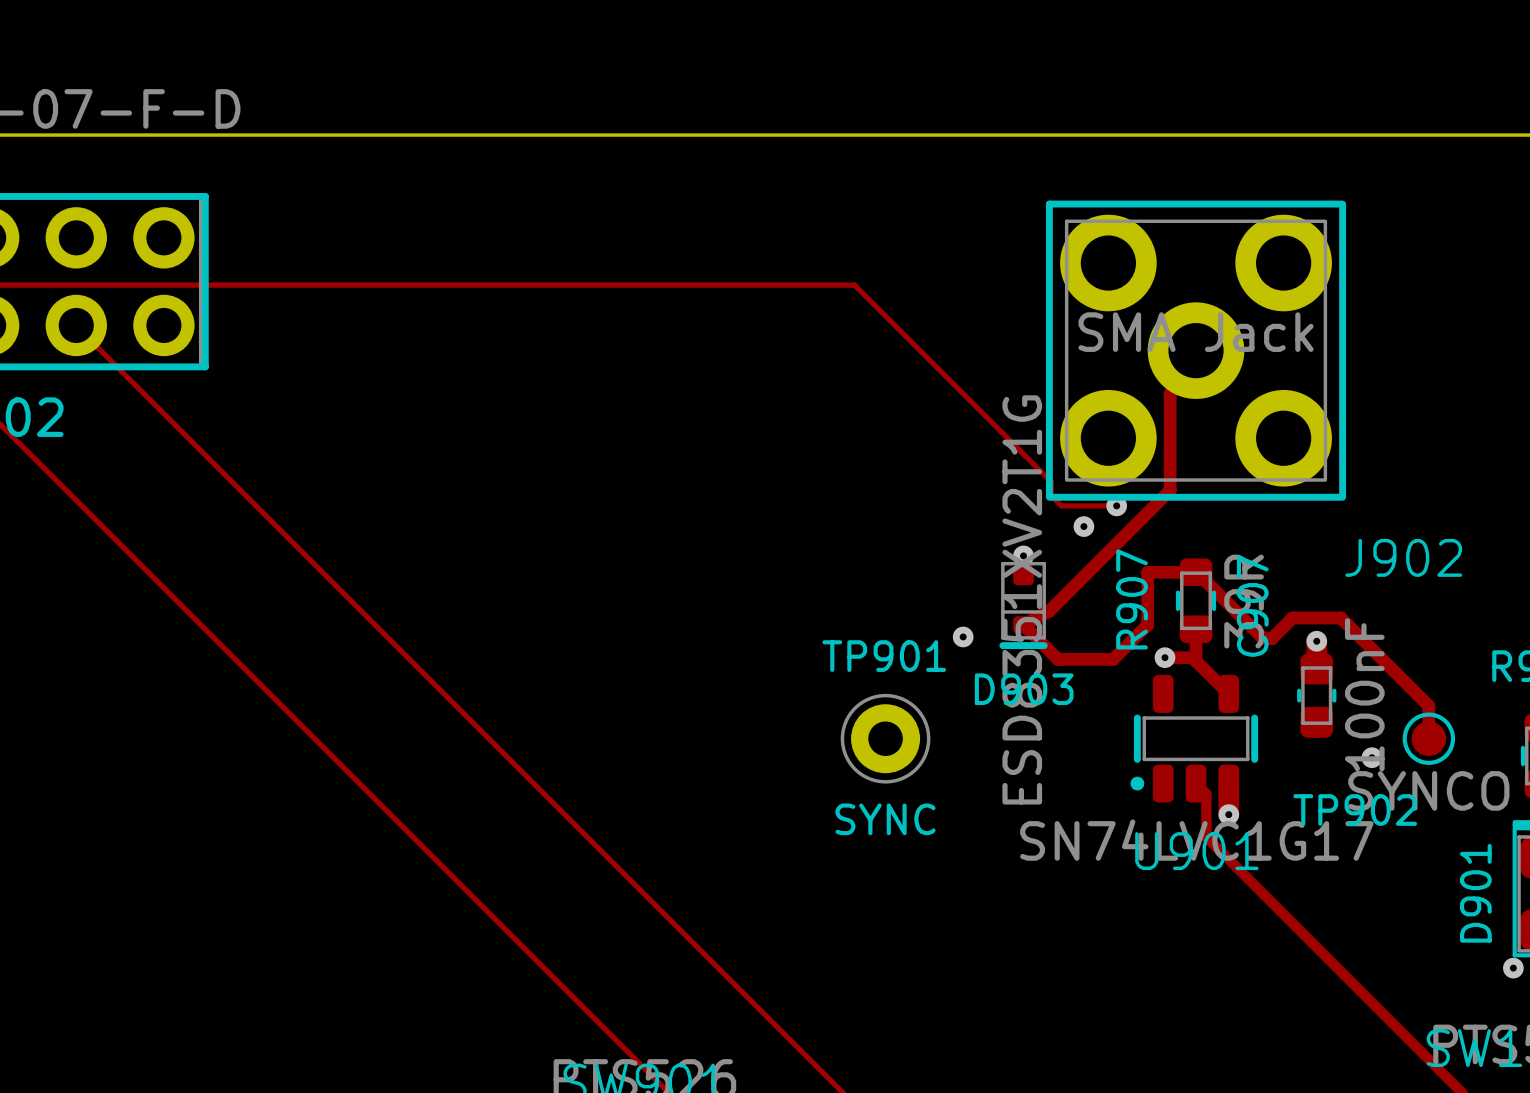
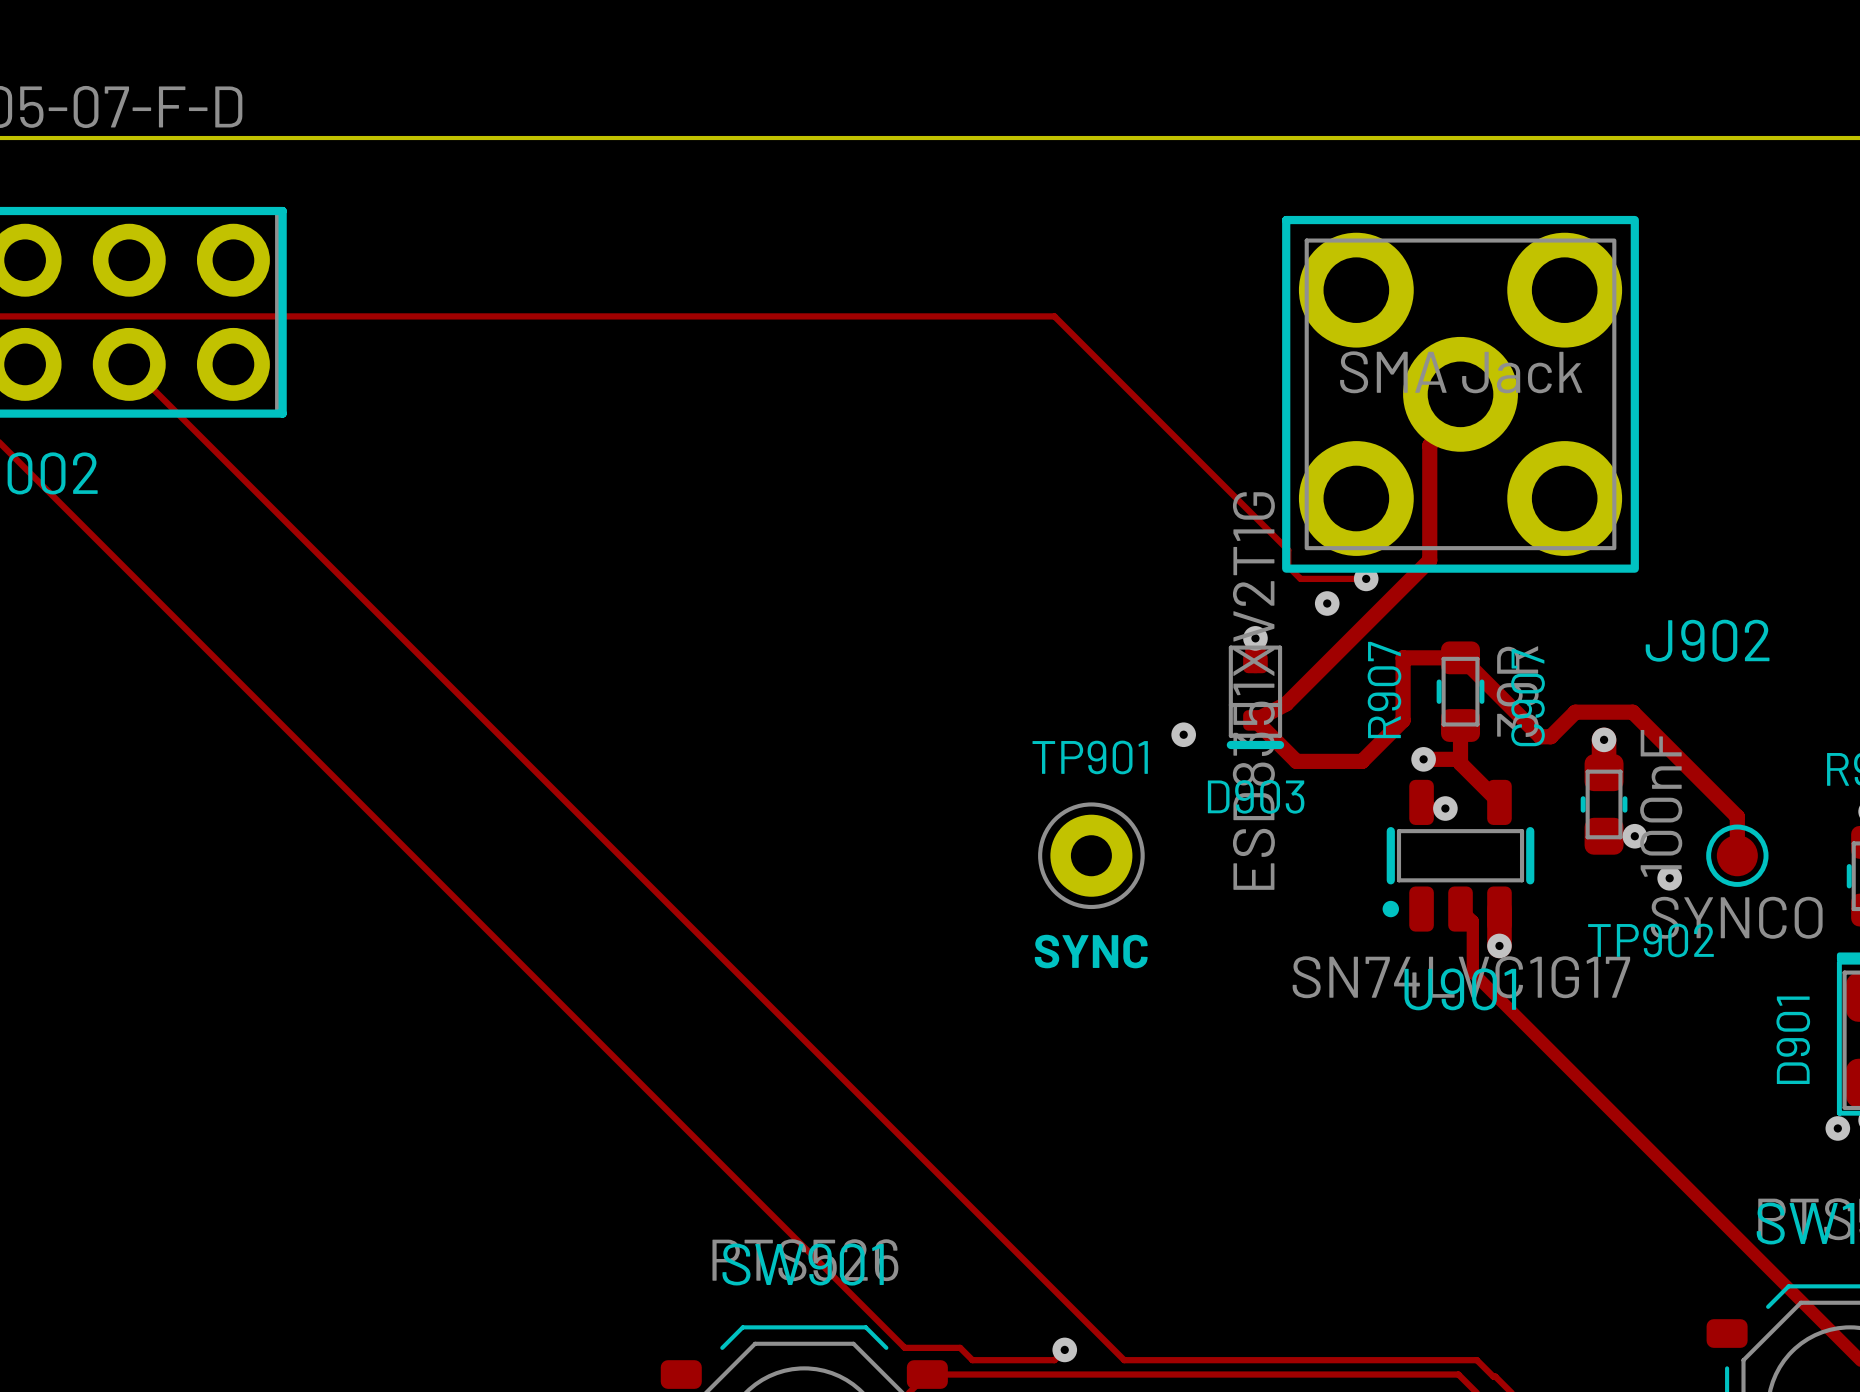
via: none -> (1445, 808)
via: none -> (1634, 836)

